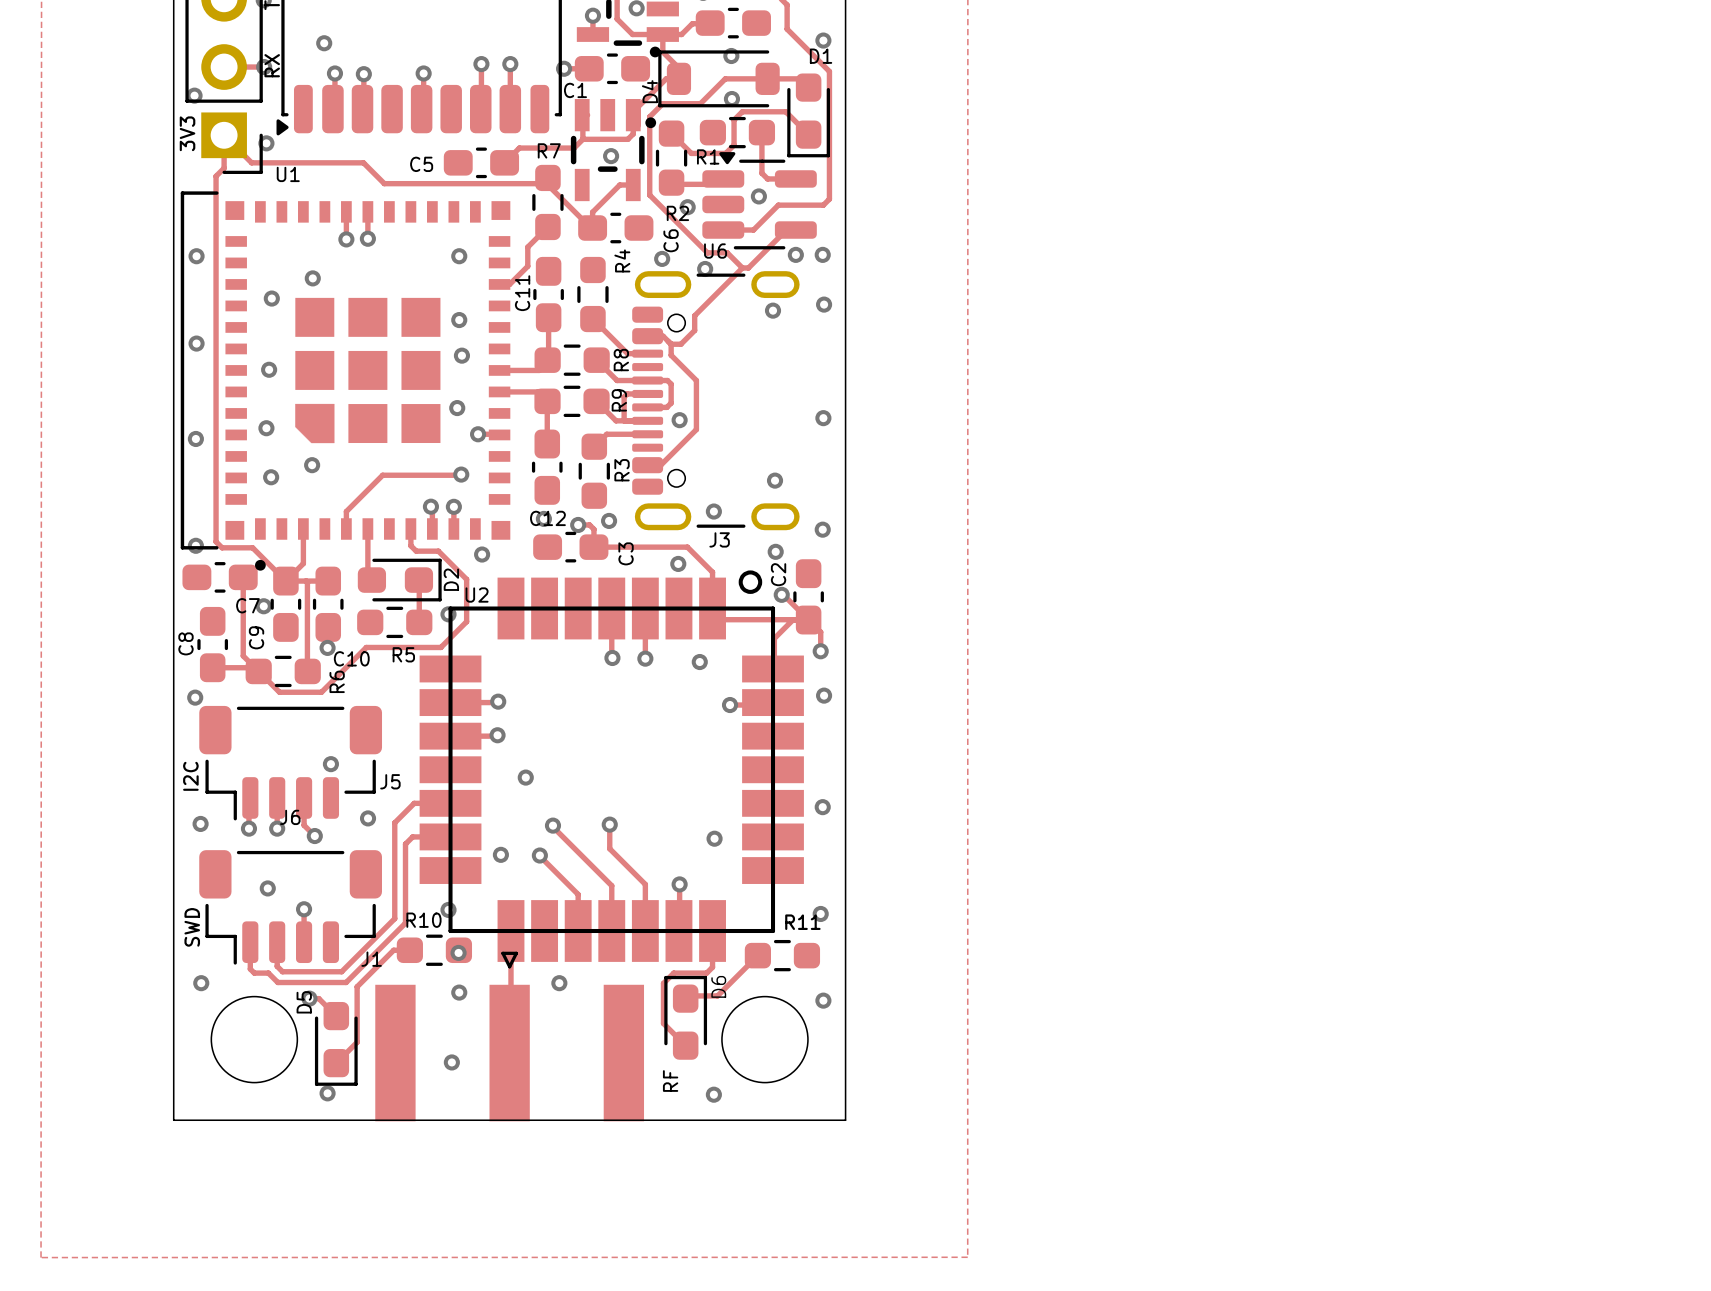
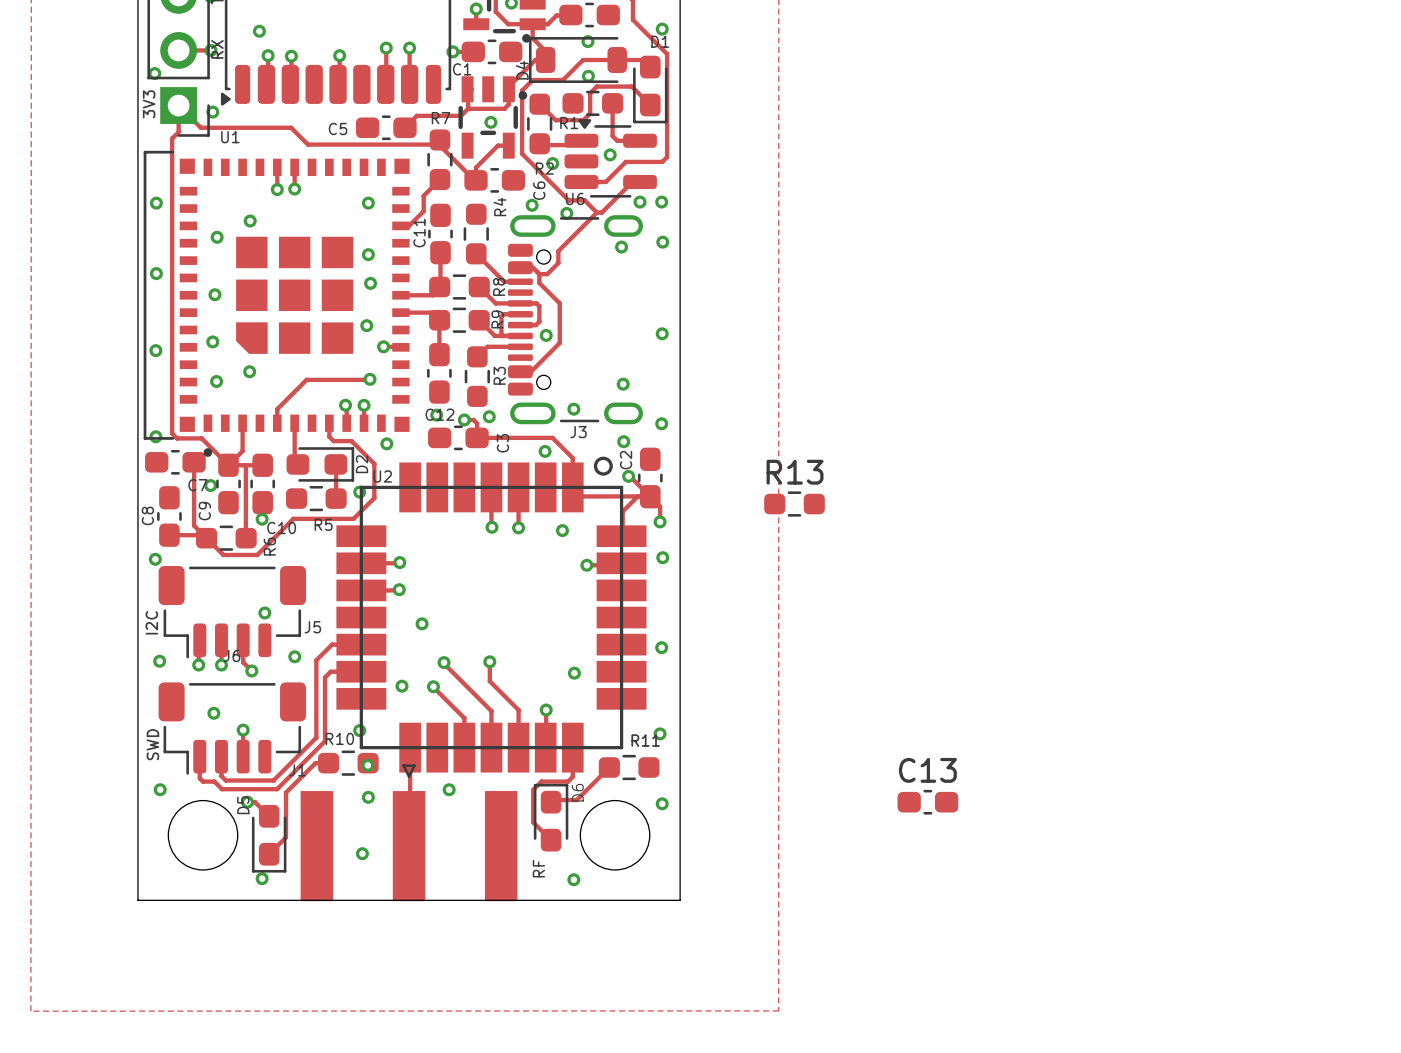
R13: none -> (794, 504)
C13: none -> (927, 802)

